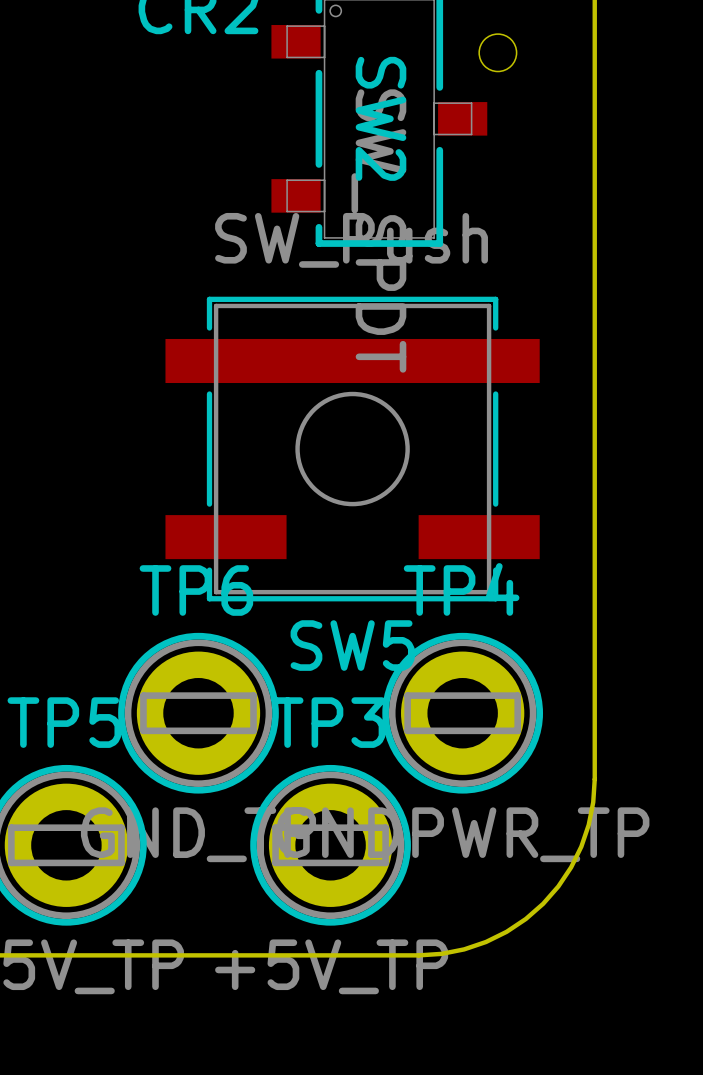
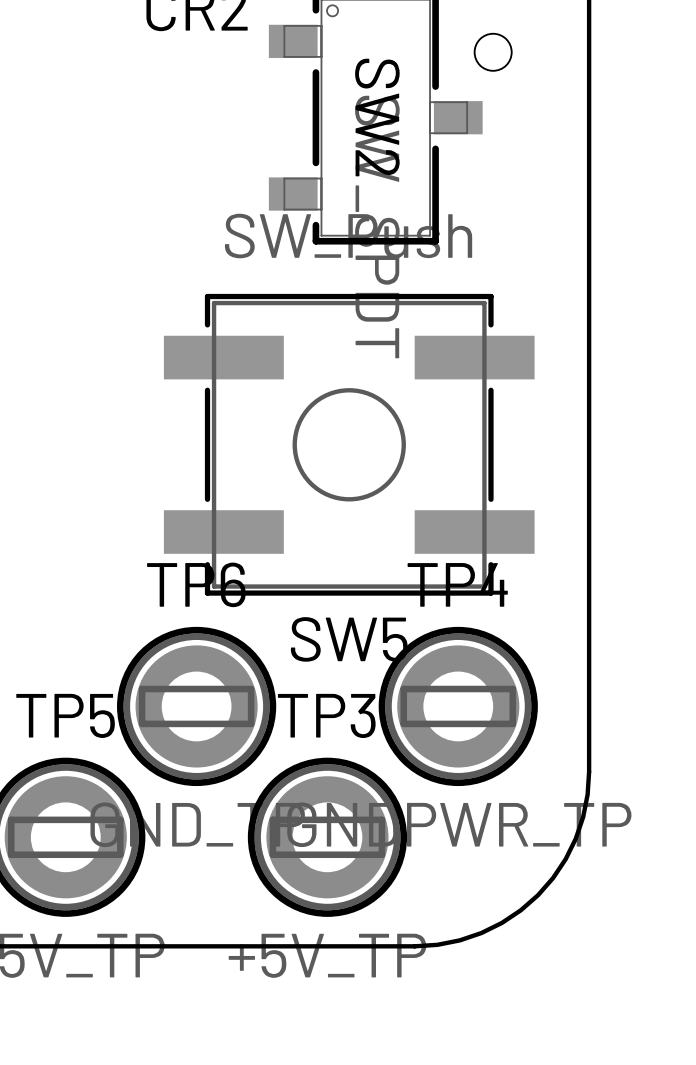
track: (226, 360) (479, 360) -> none

